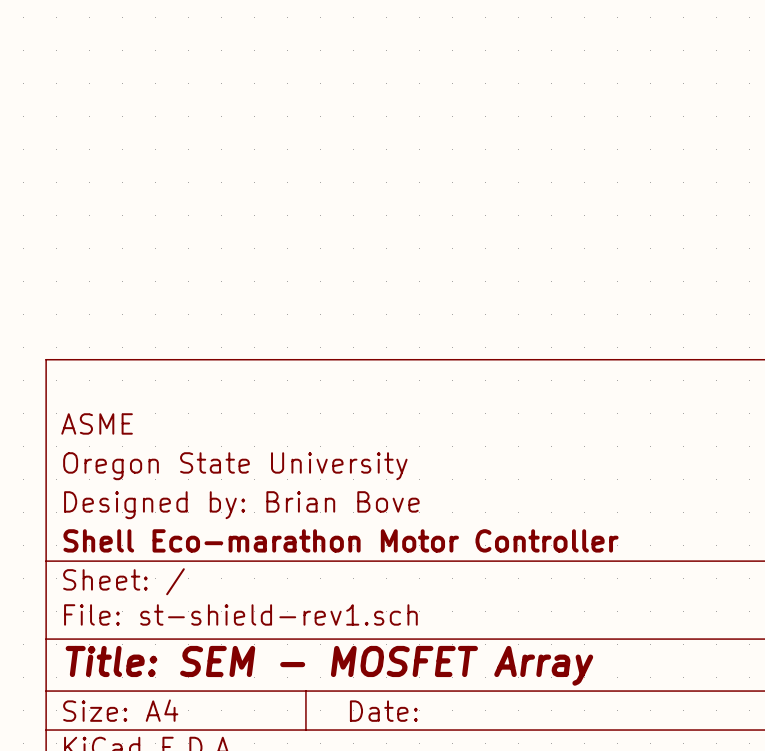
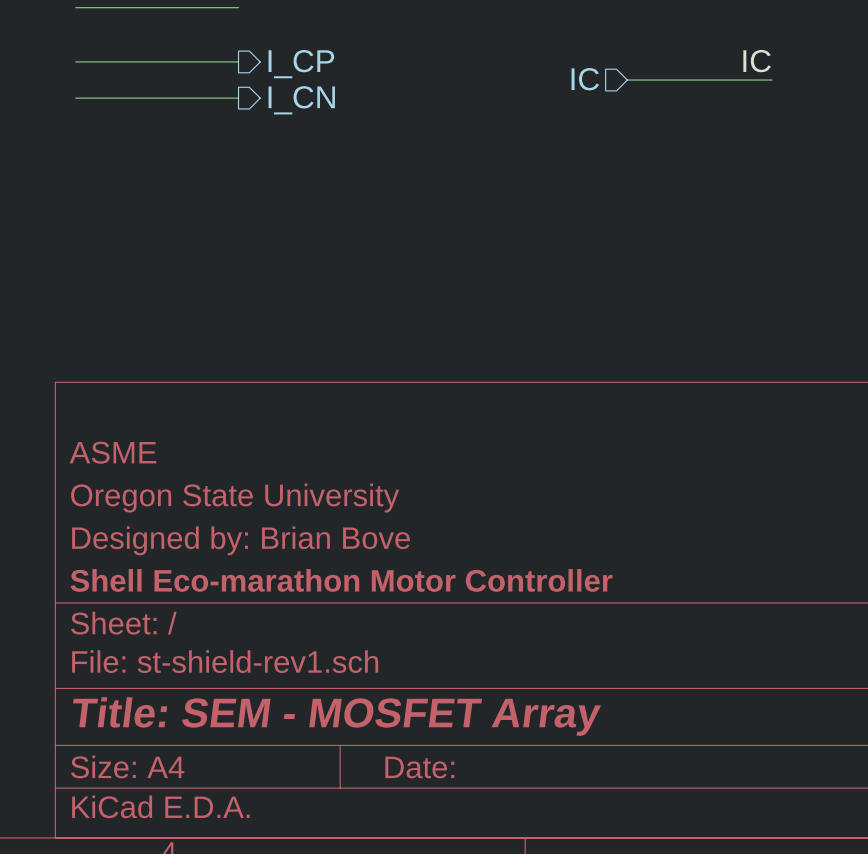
wire: none -> (75, 7) (238, 7)
label: none -> IC (757, 61)
wire: none -> (75, 61) (238, 61)
sheet pin: none -> I_CP (301, 64)
sheet pin: none -> IC (585, 79)
wire: none -> (627, 80) (772, 80)
wire: none -> (75, 98) (238, 98)
sheet pin: none -> I_CN (301, 100)

